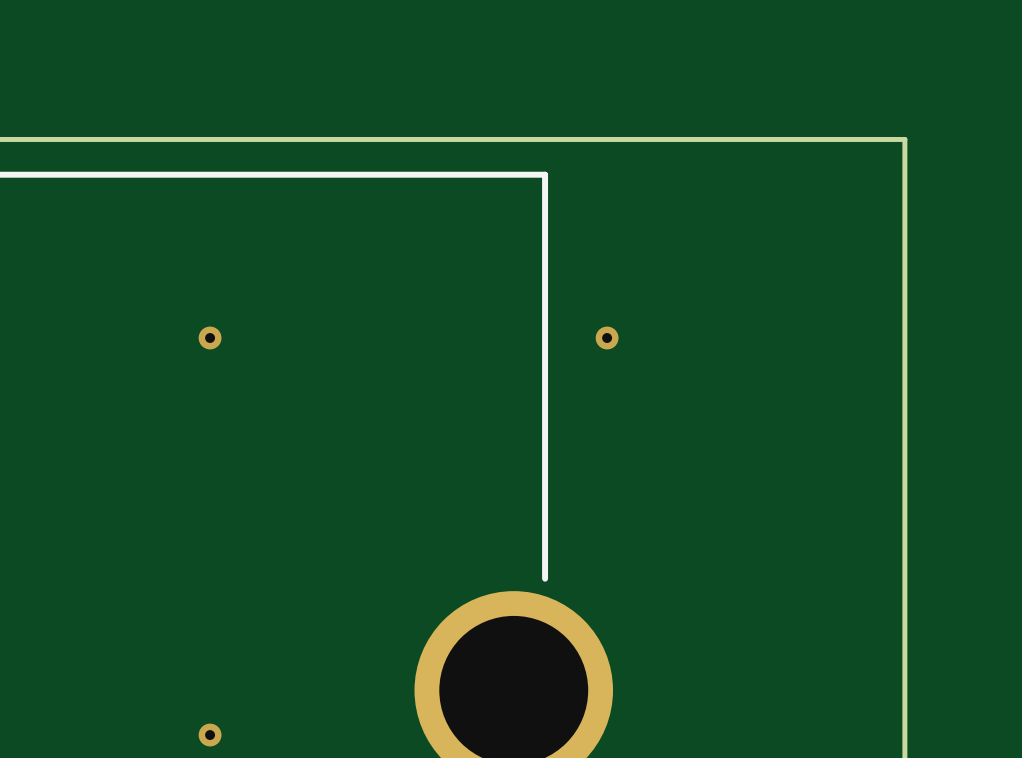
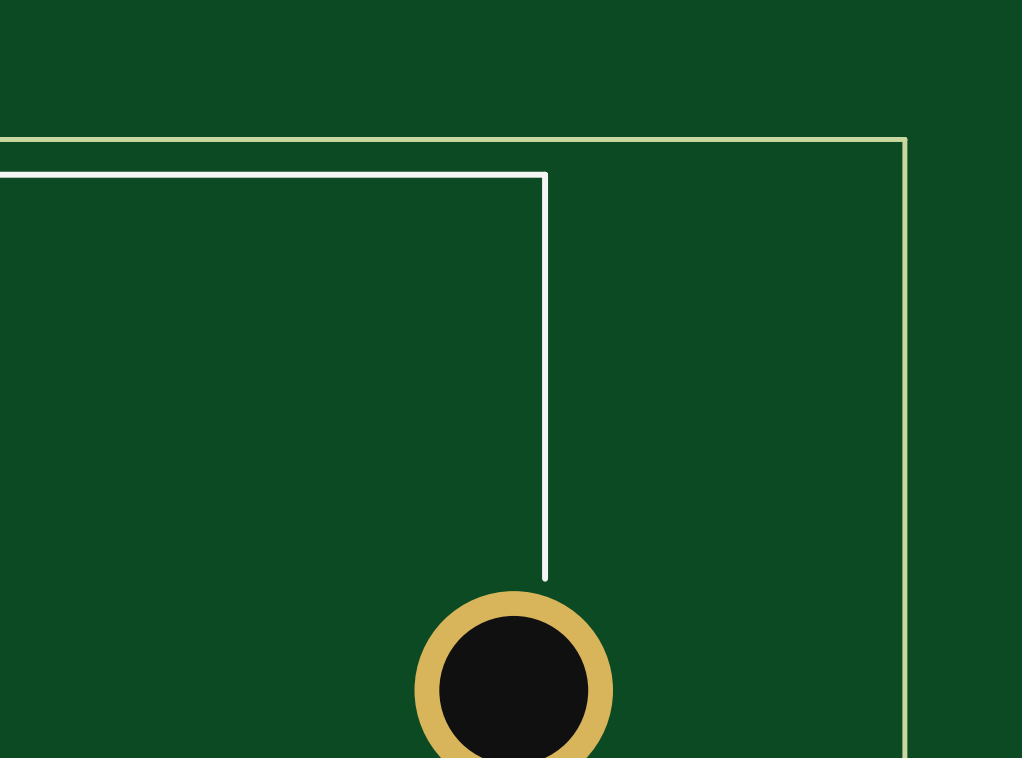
via: (210, 338) -> none
via: (607, 338) -> none
via: (210, 735) -> none

